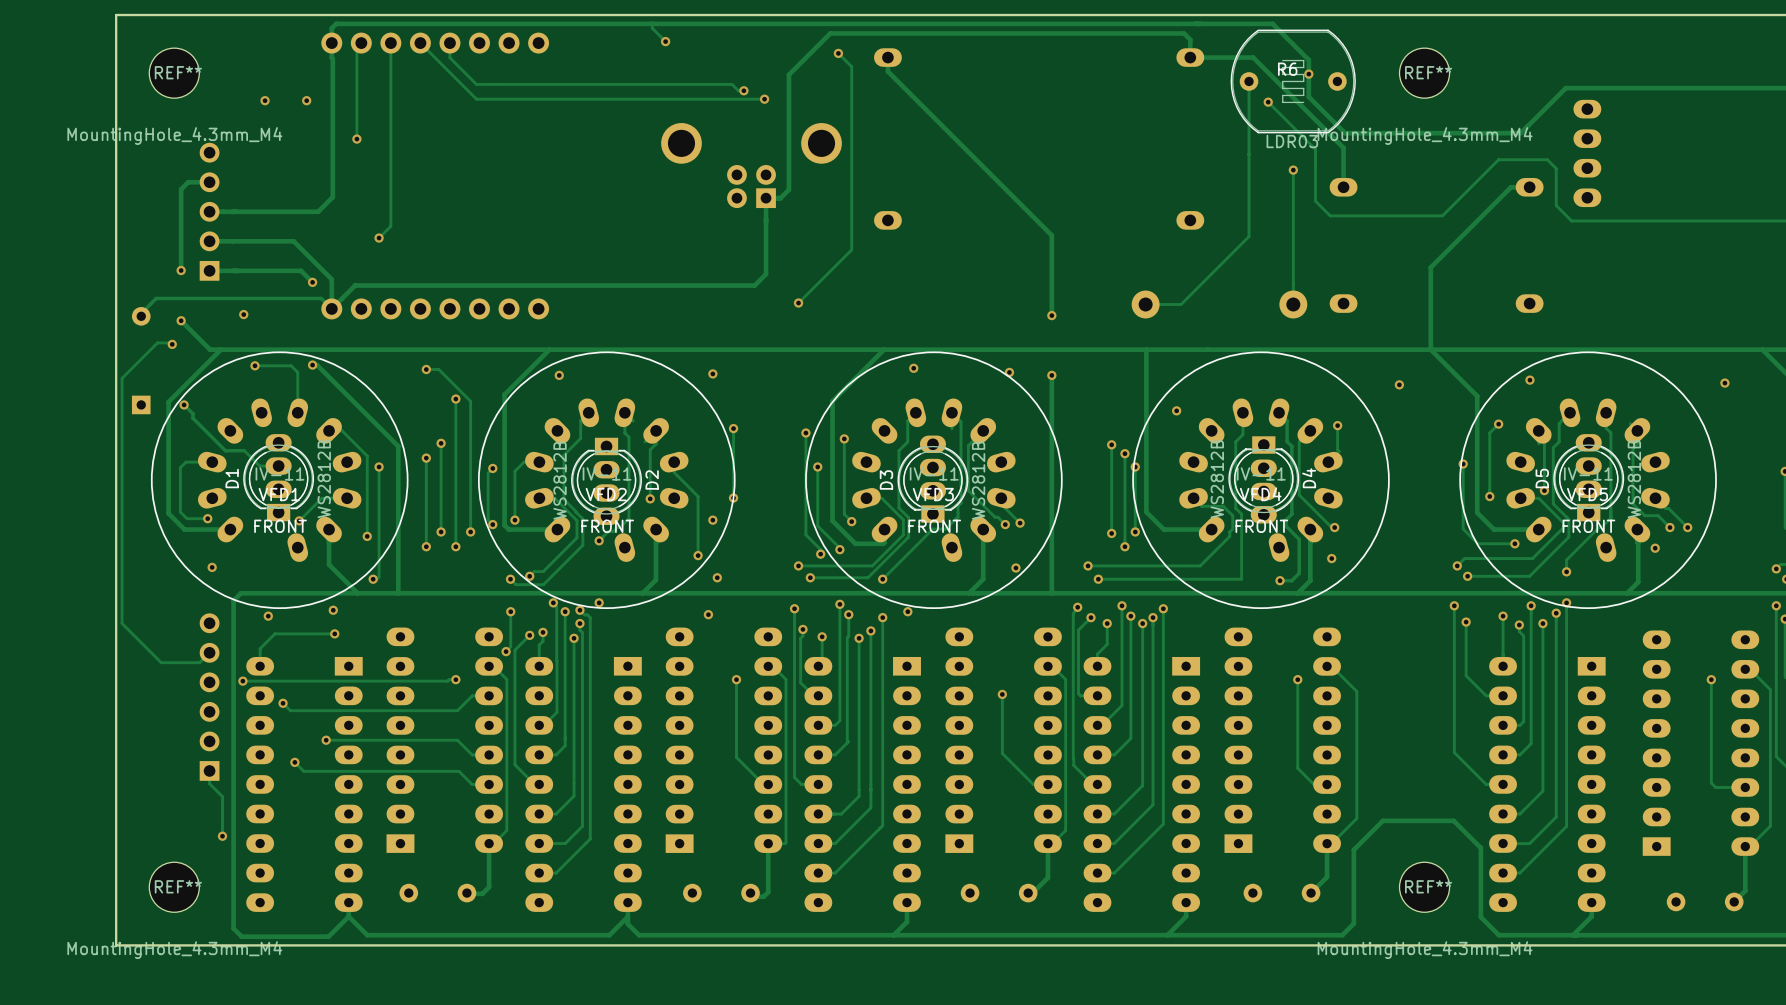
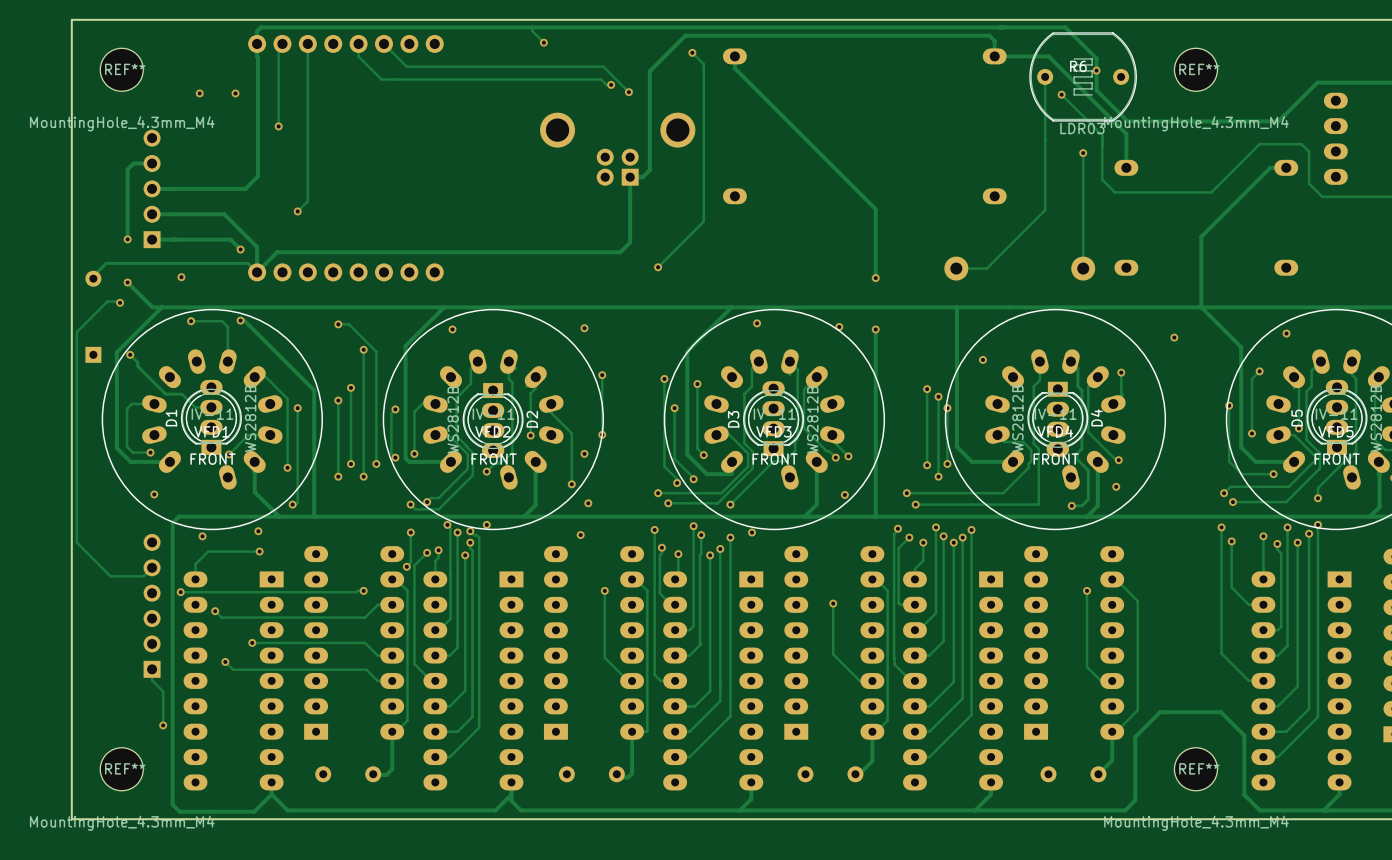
track: (420, 43) (476, 99) (761, 99) -> none
track: none -> (383, 43) (406, 66) (603, 66) (628, 92)

